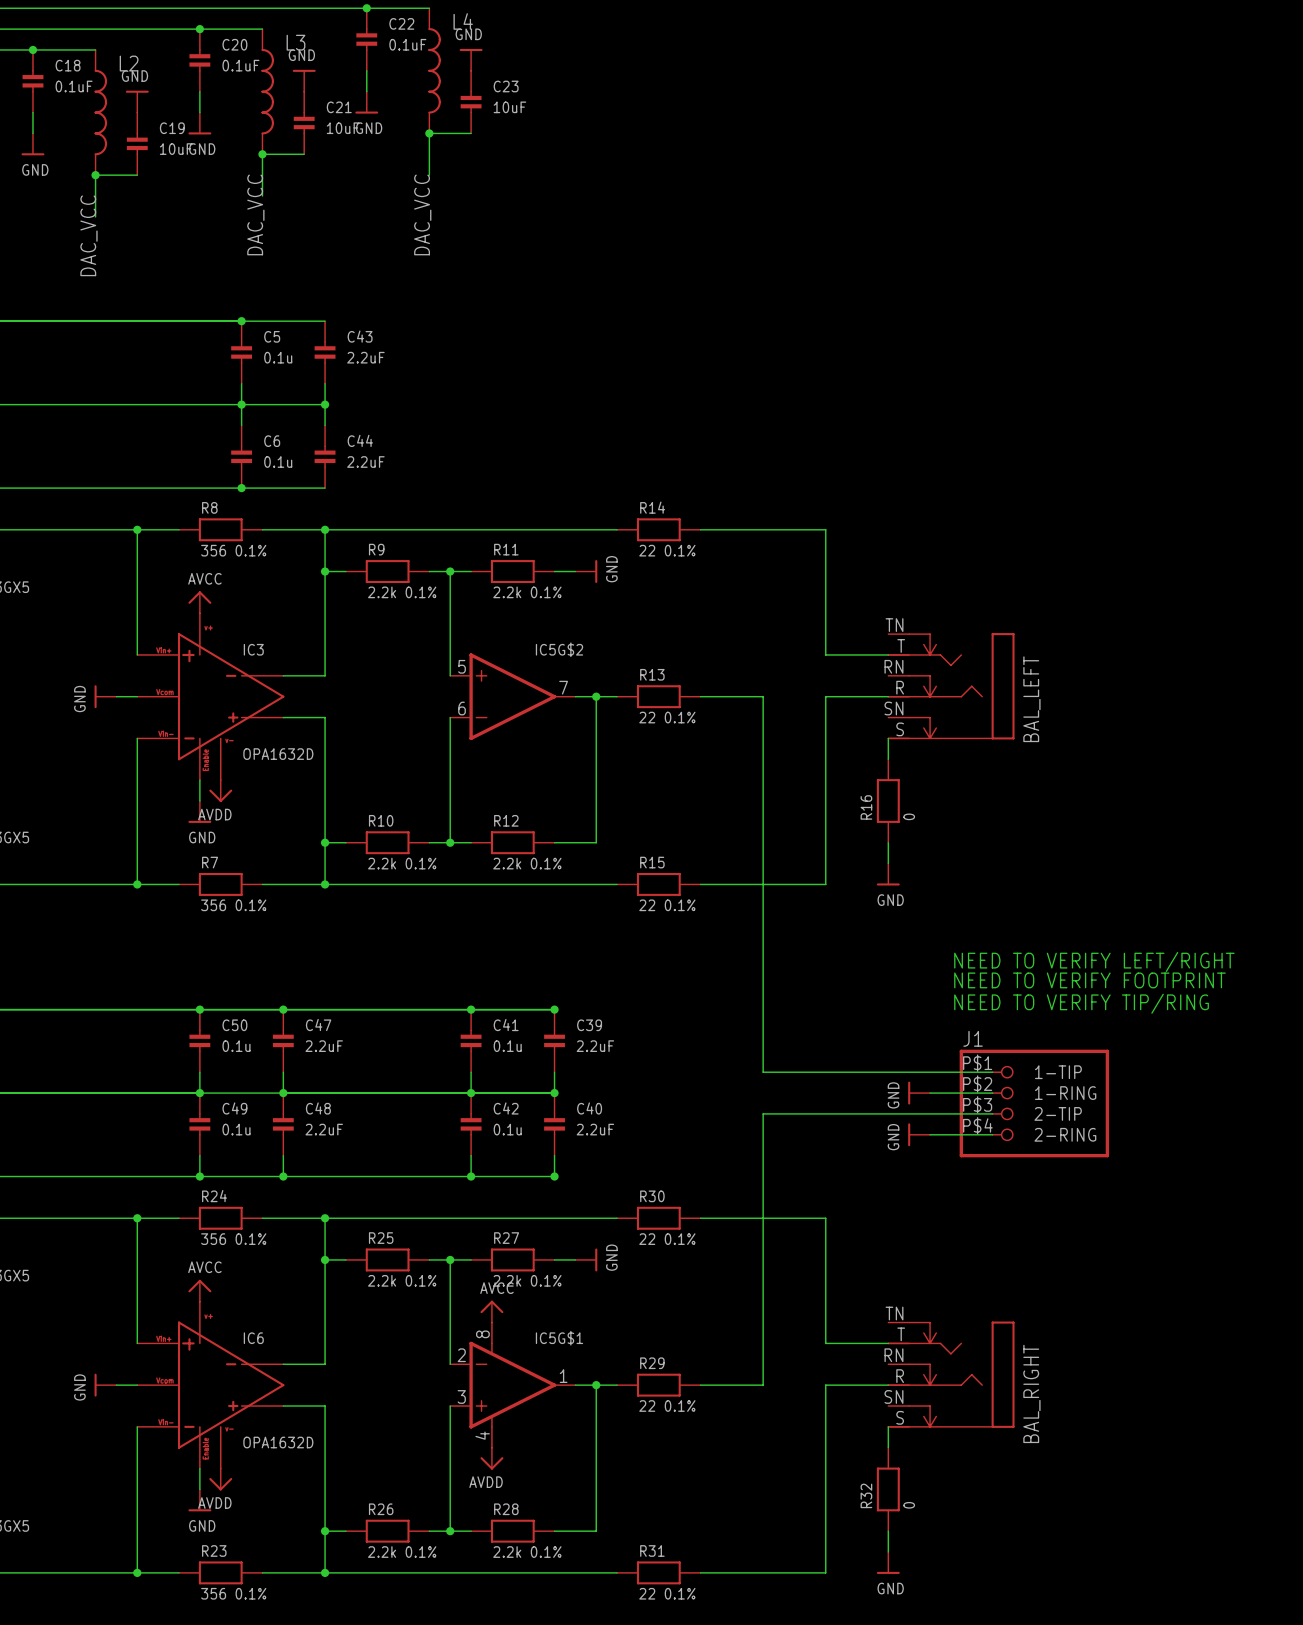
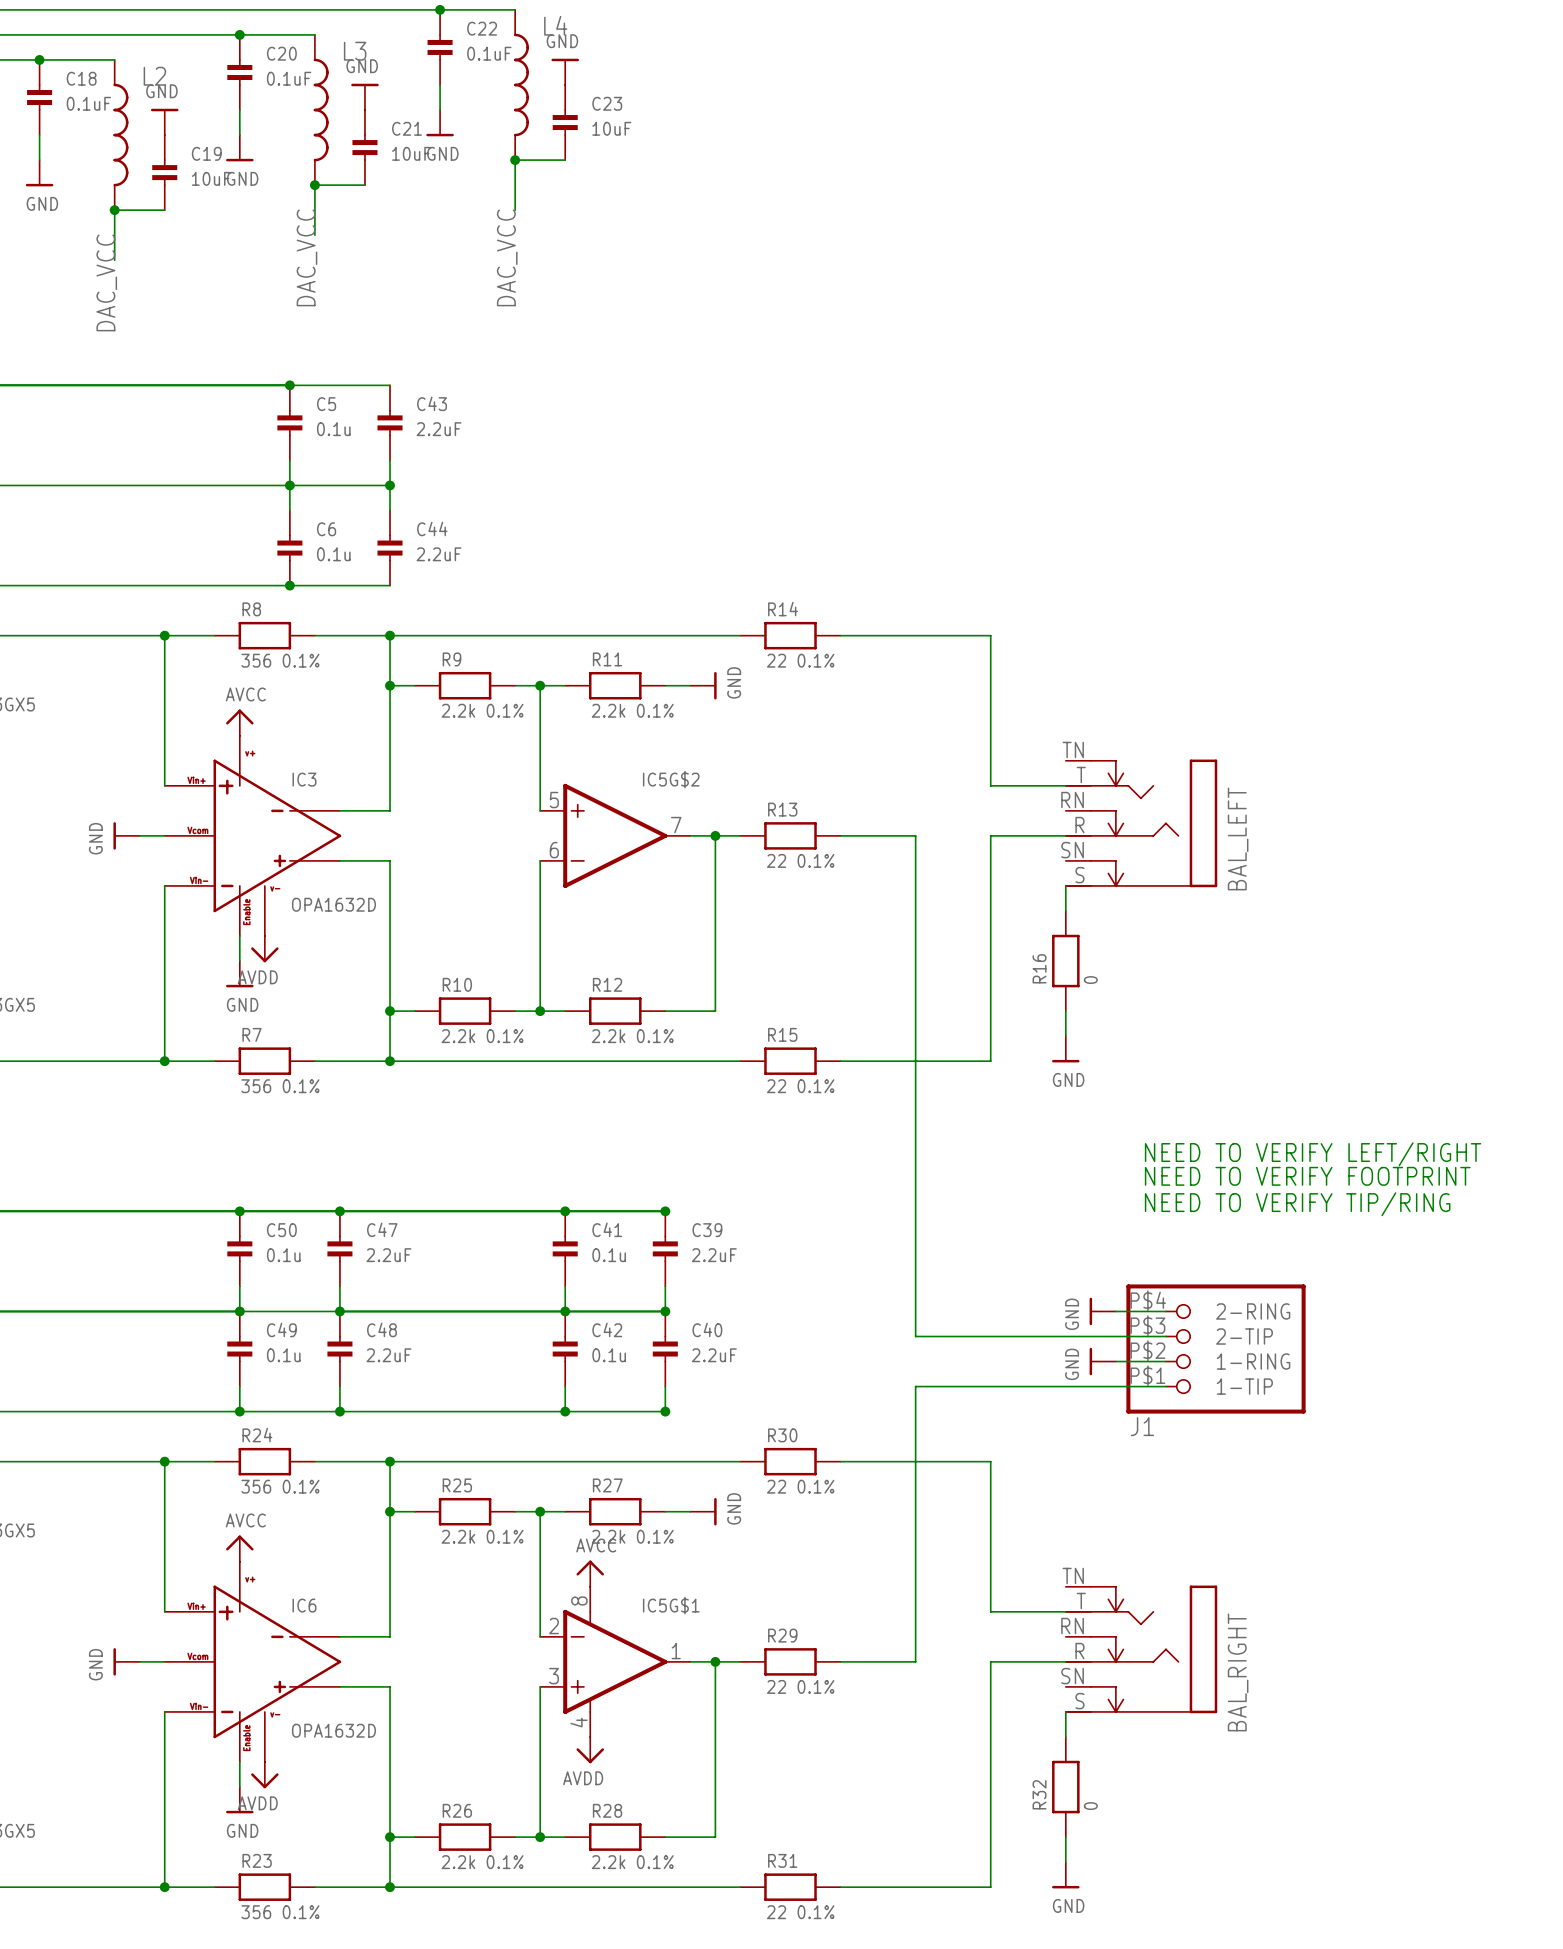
wire: (763, 1072) (992, 1072) -> none
wire: (971, 1093) (992, 1093) -> none
J1 flip: as is (1034, 1103) -> up-down (1216, 1349)
wire: (763, 1113) (763, 1155) -> (915, 1336) (915, 1286)
wire: (971, 1113) (992, 1113) -> none
wire: (971, 1134) (992, 1134) -> none
wire: none -> (915, 1386) (1165, 1386)

